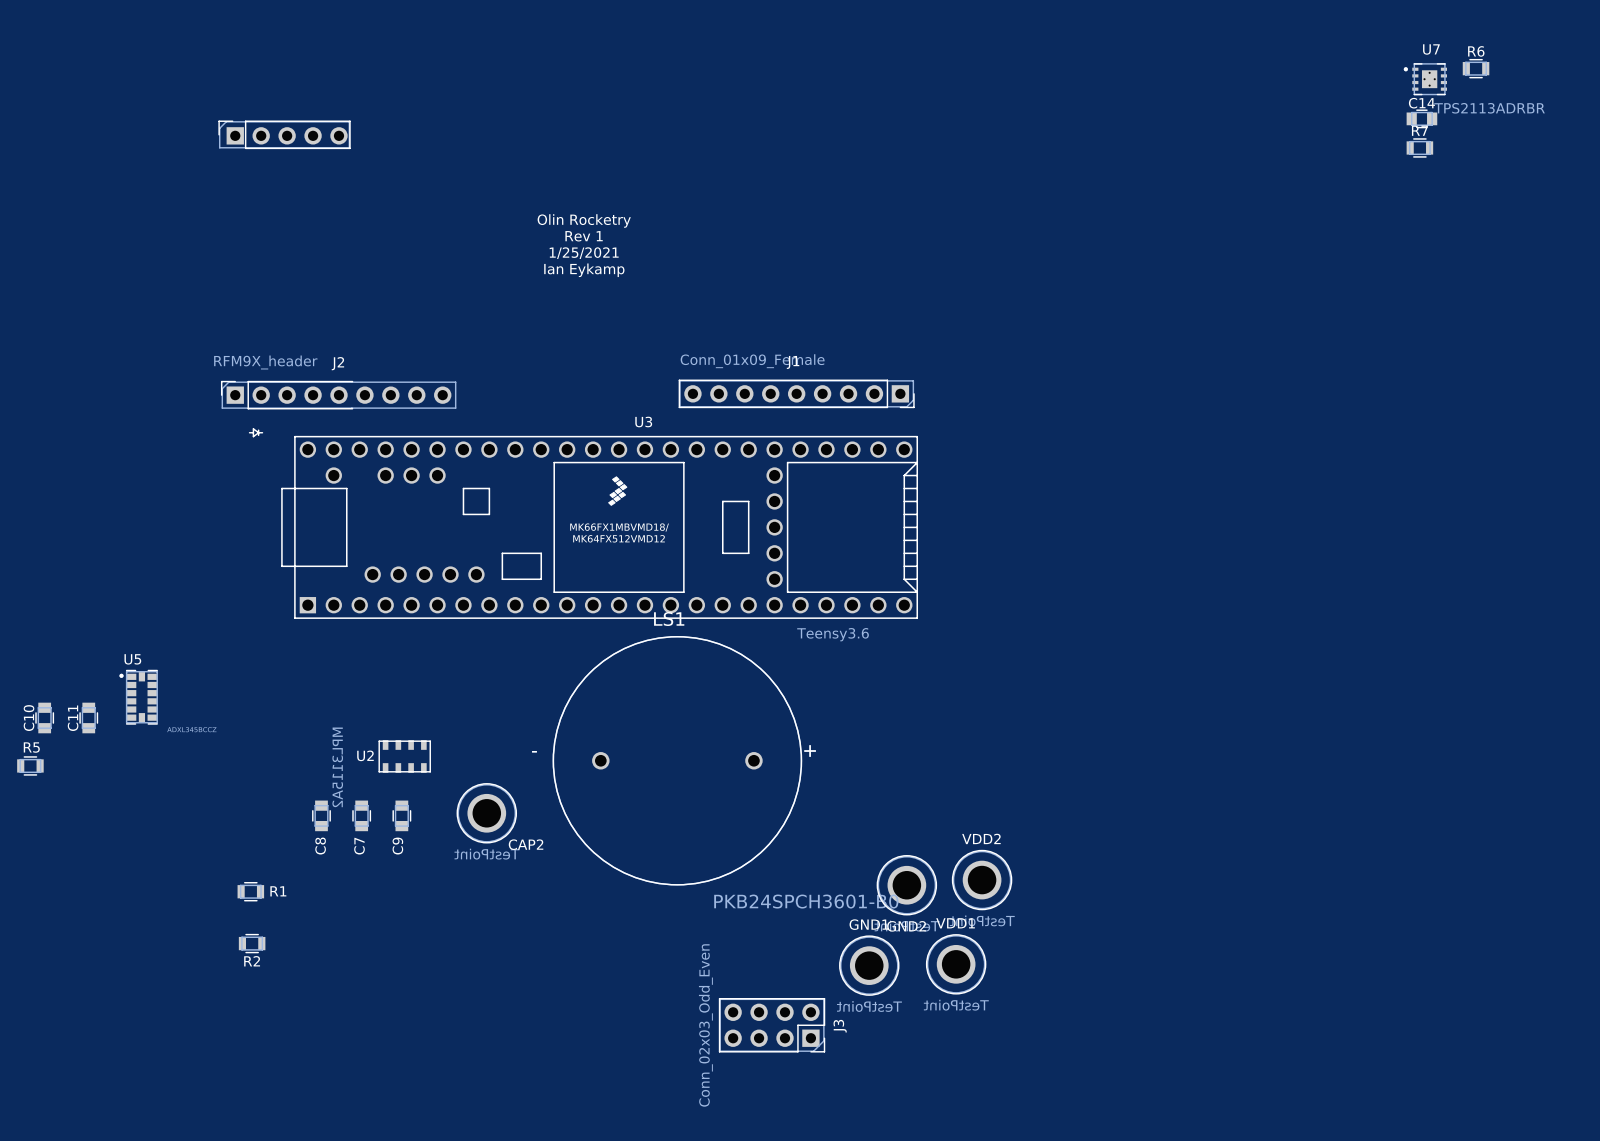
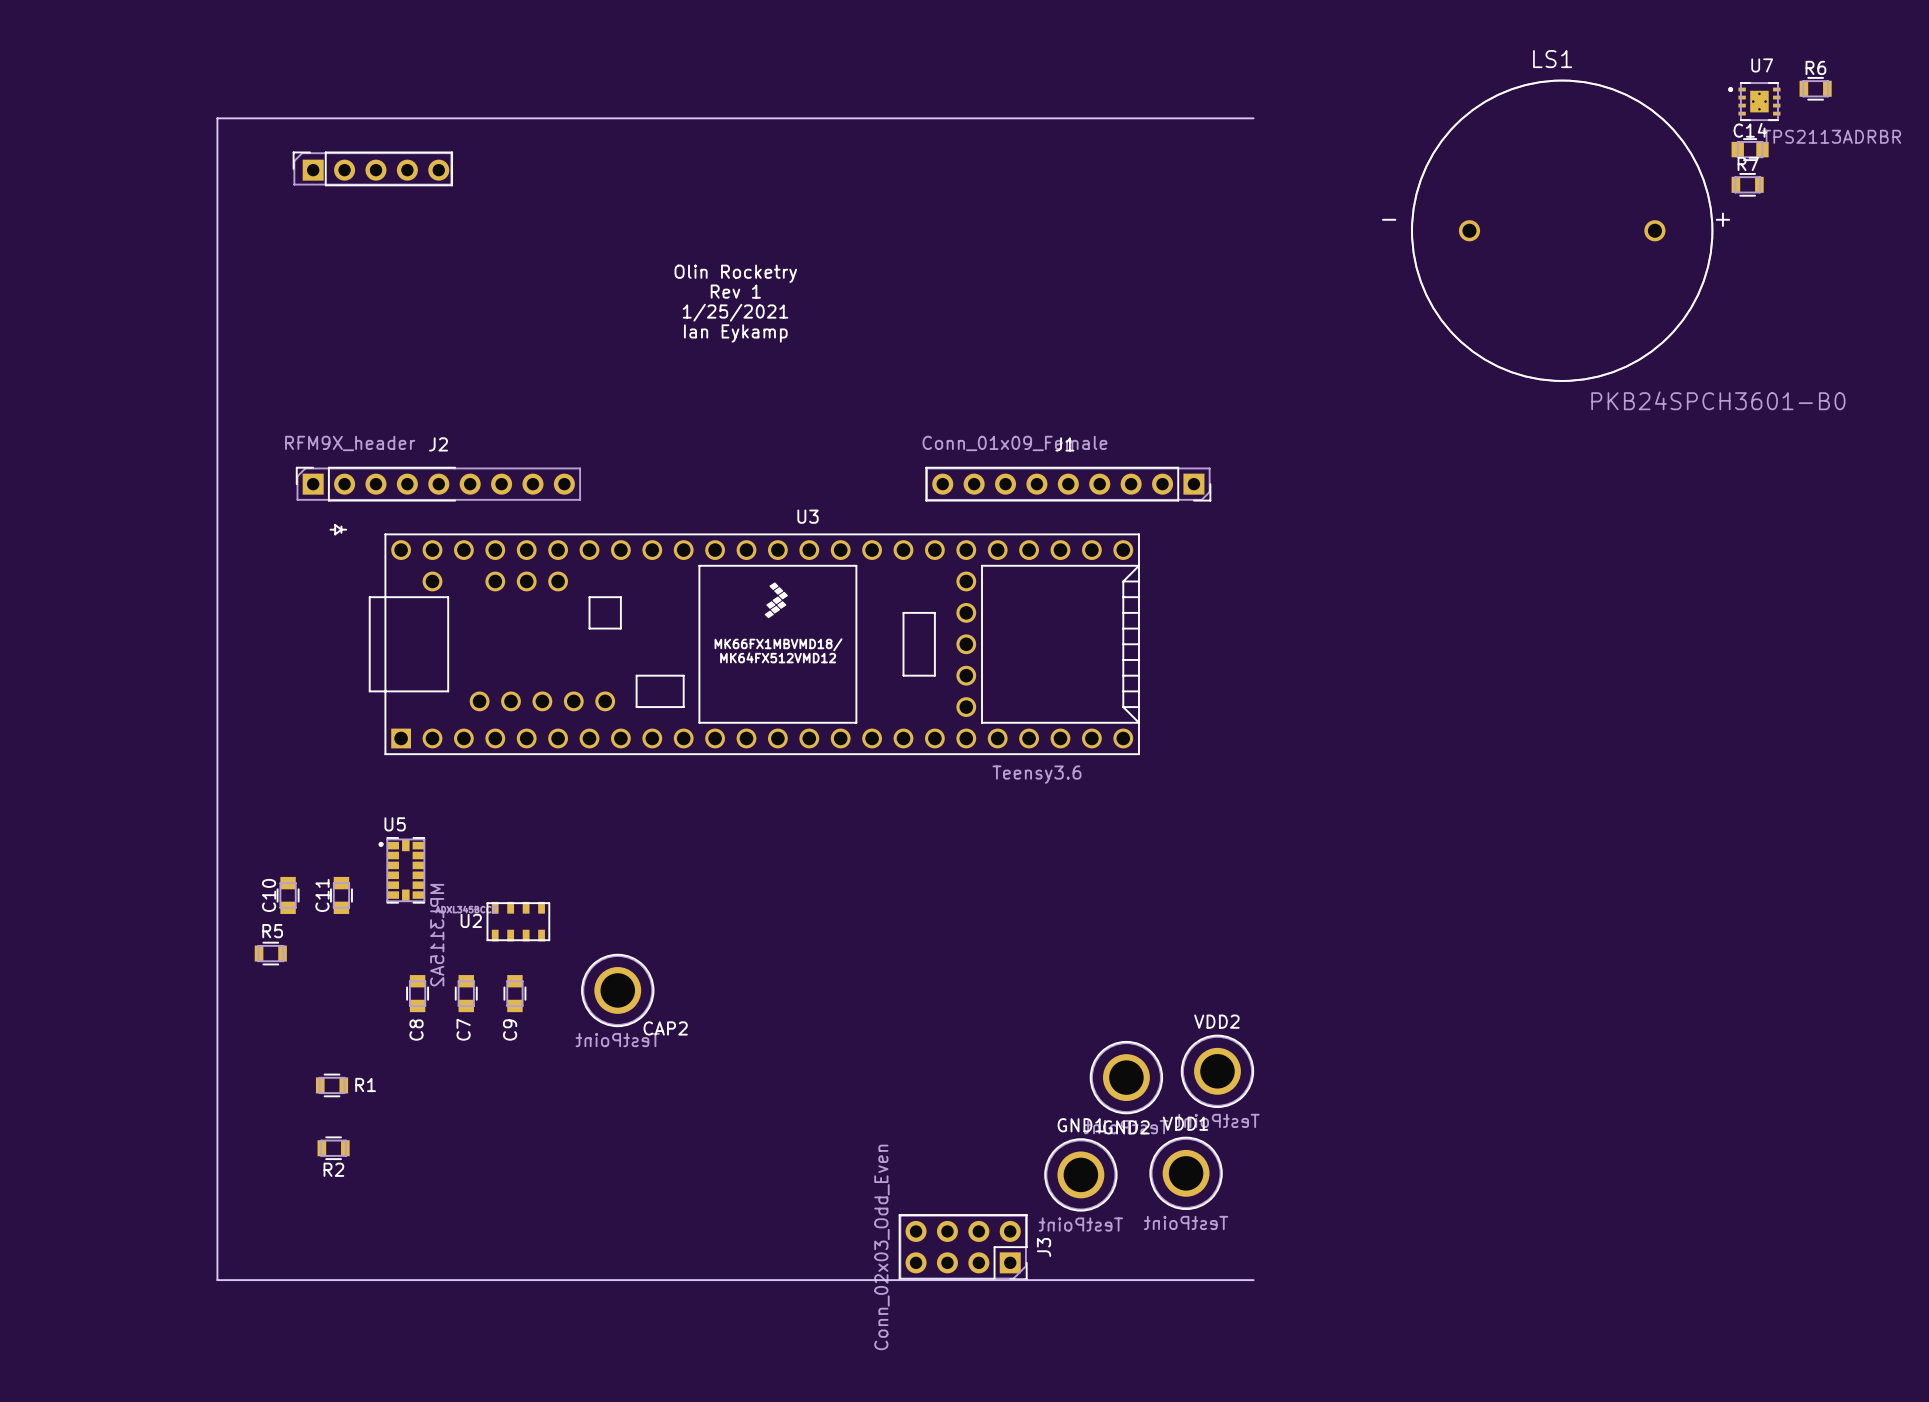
board edge: none -> (1253, 118) (217, 118) (217, 1280) (1253, 1280)
J1 position: (796, 393) -> (1068, 484)
U5 position: (138, 697) -> (401, 870)
C10 position: (44, 717) -> (288, 895)
C11 position: (88, 717) -> (341, 895)
LS1 position: (677, 760) -> (1562, 230)
R5 position: (30, 765) -> (270, 953)

